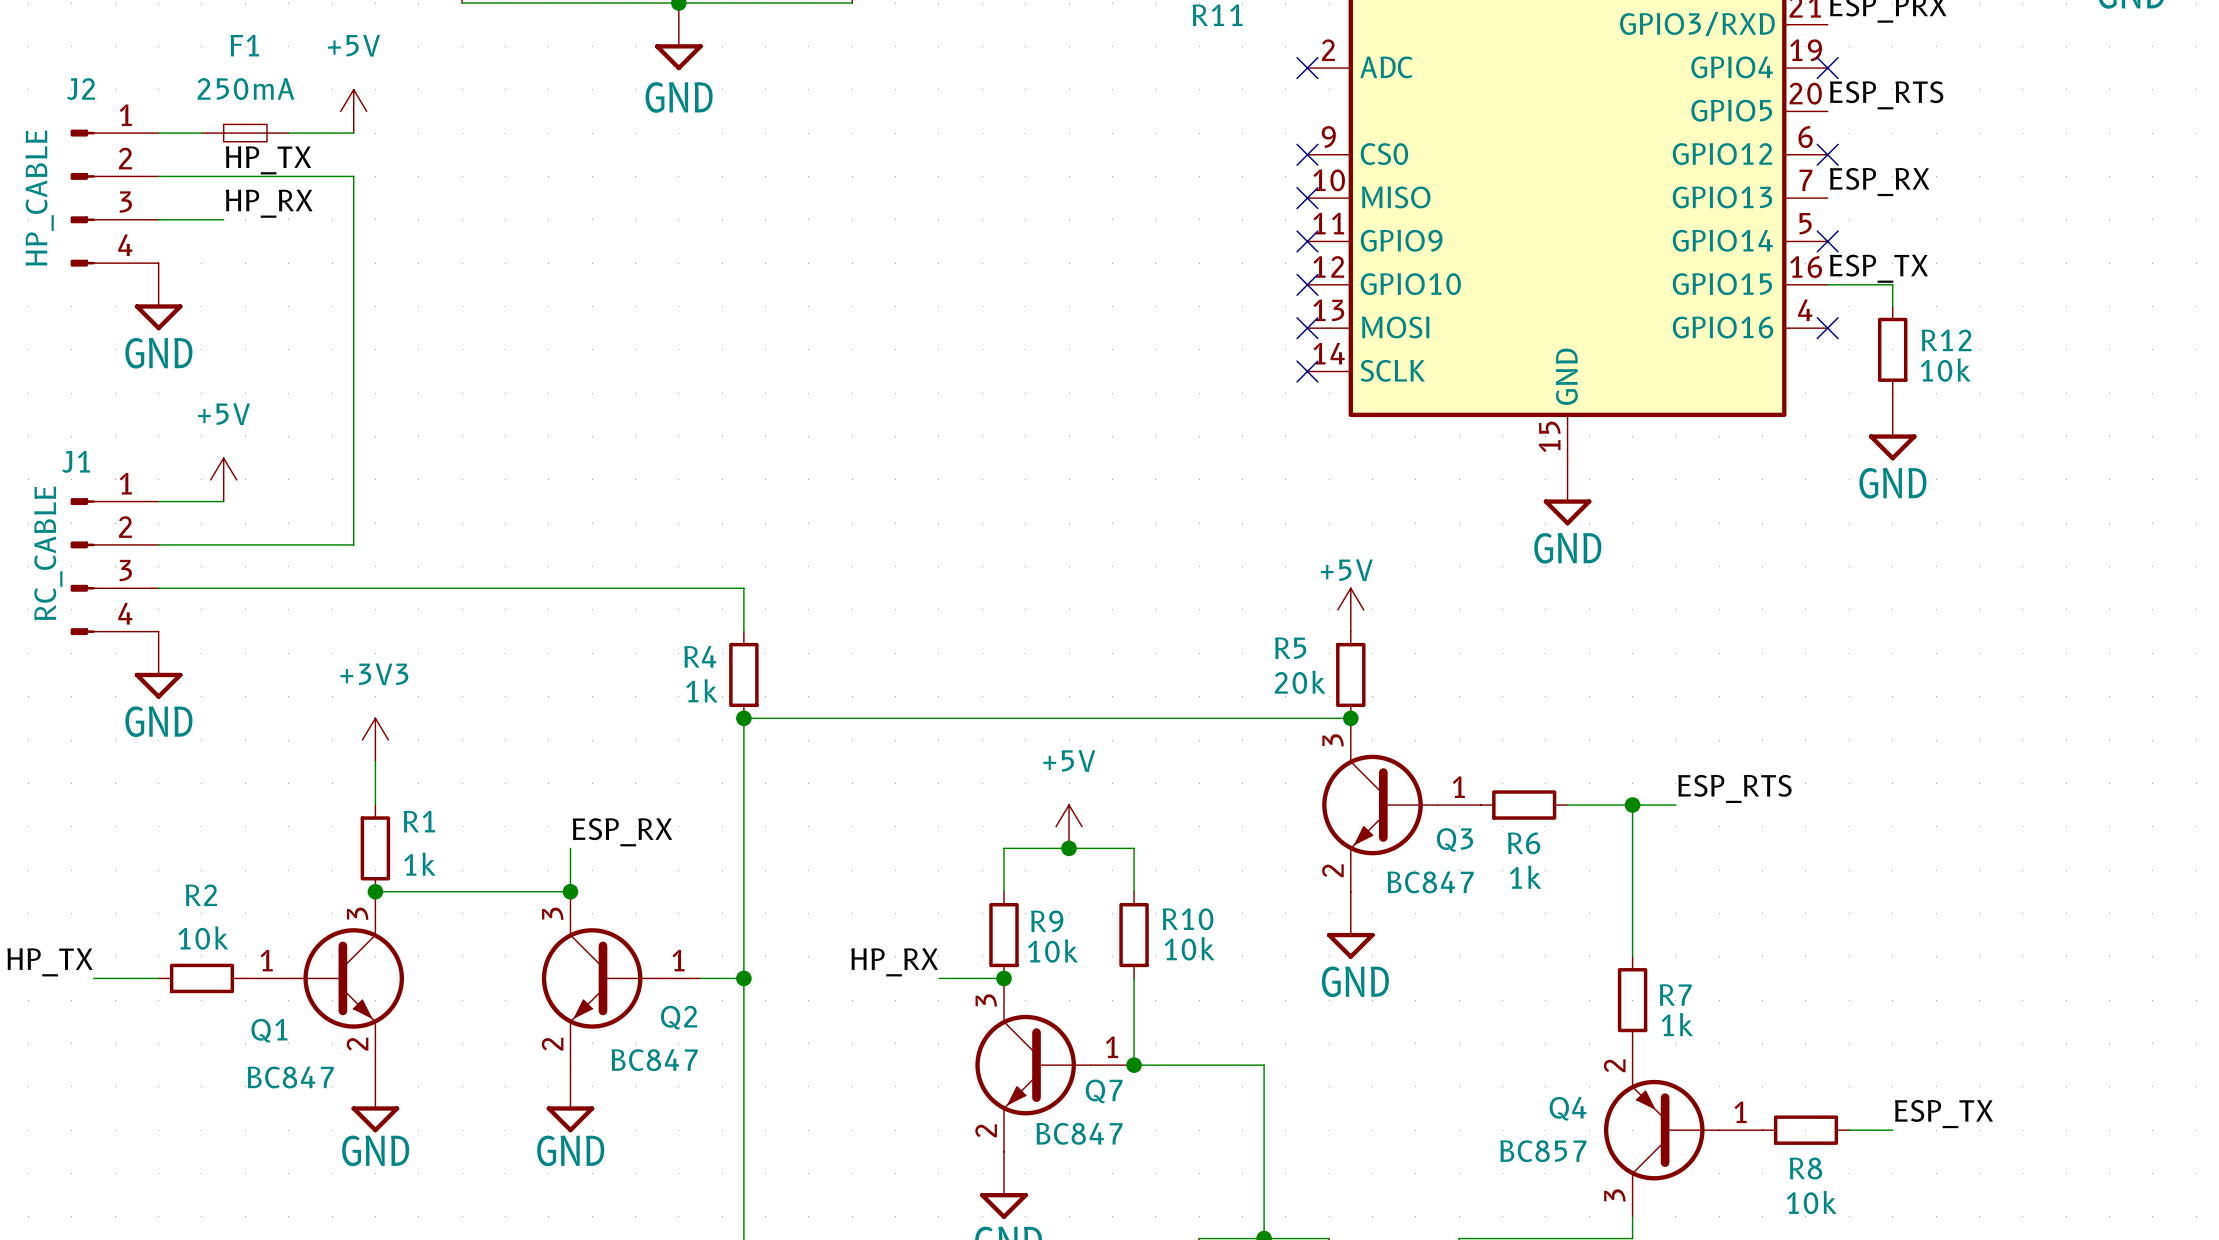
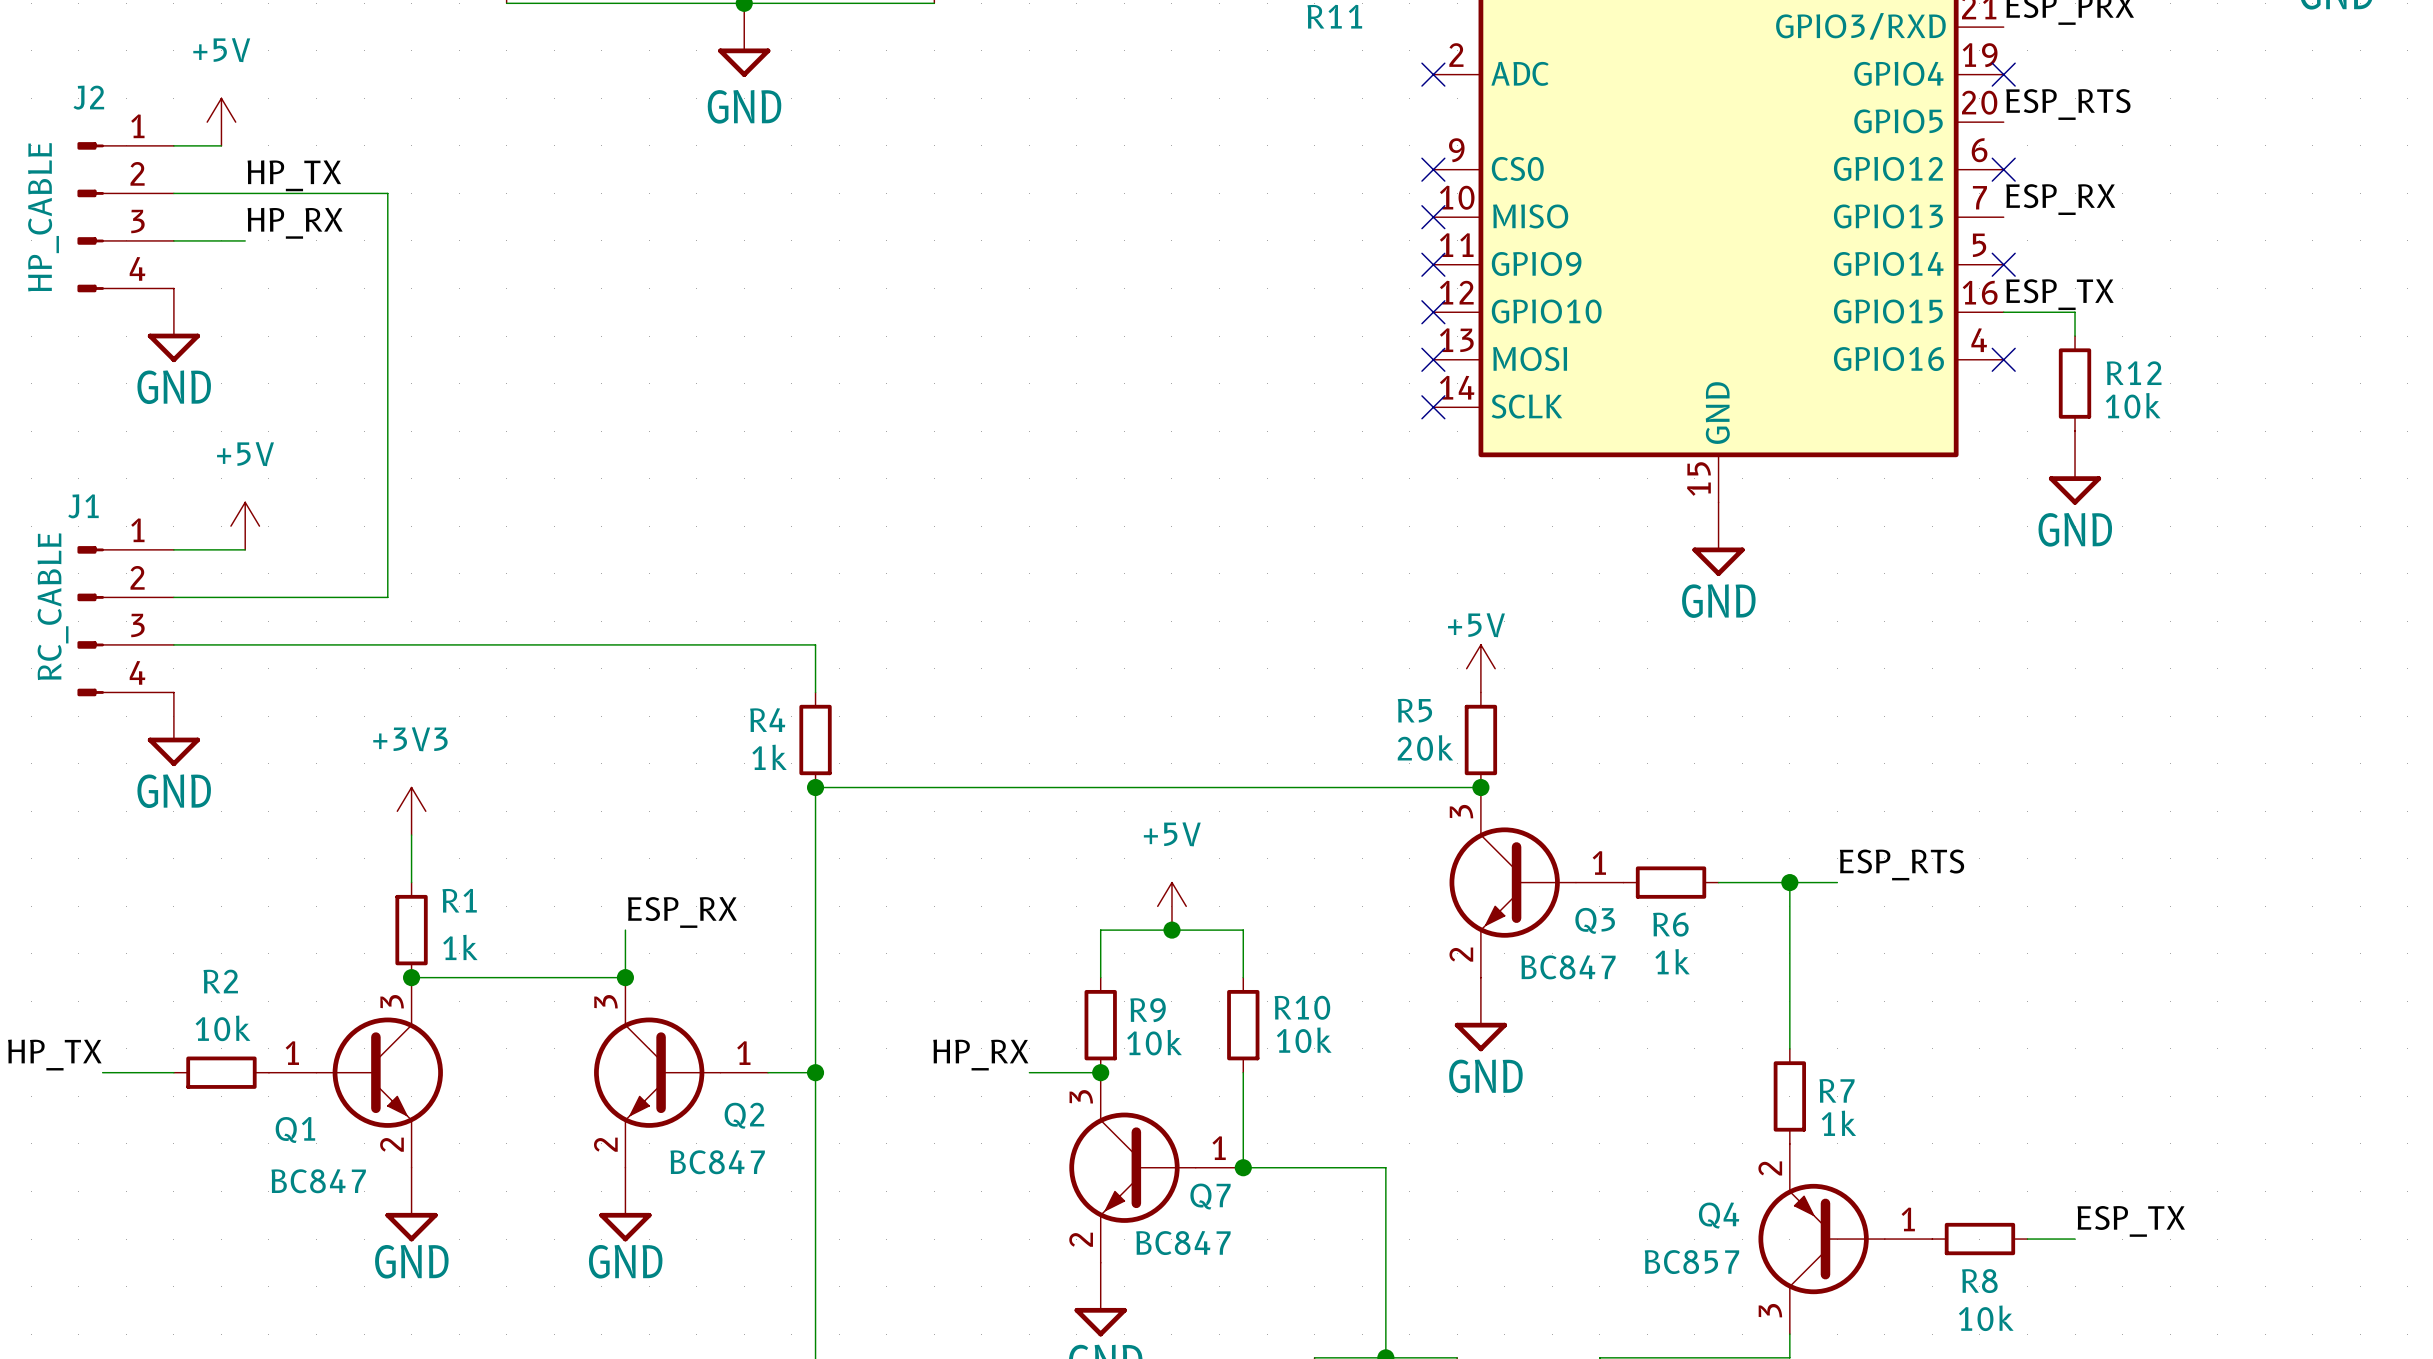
power symbol position: +5V (353, 111) -> +5V (221, 122)
F1: 250mA (245, 133) -> none
wire: (288, 133) (353, 133) -> none

